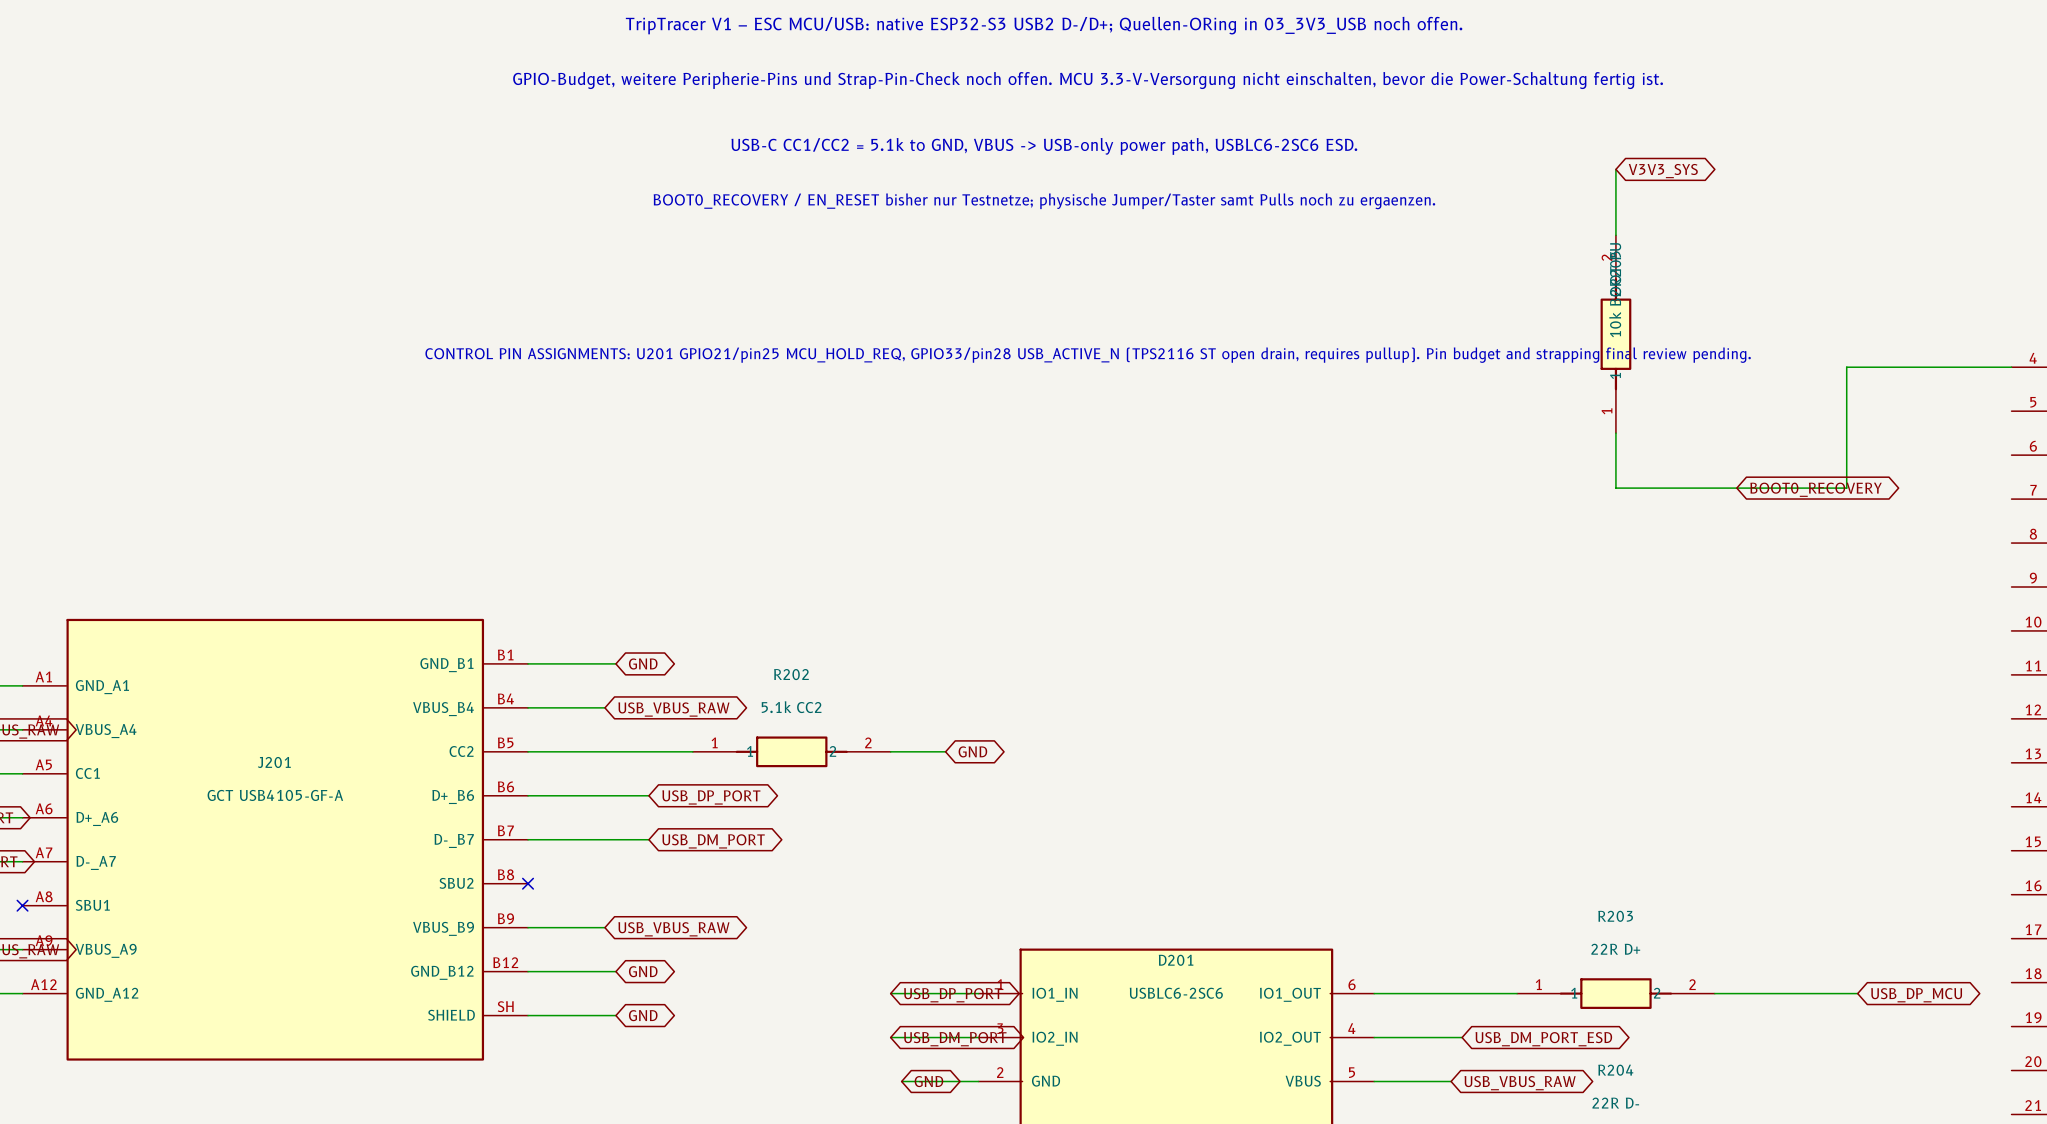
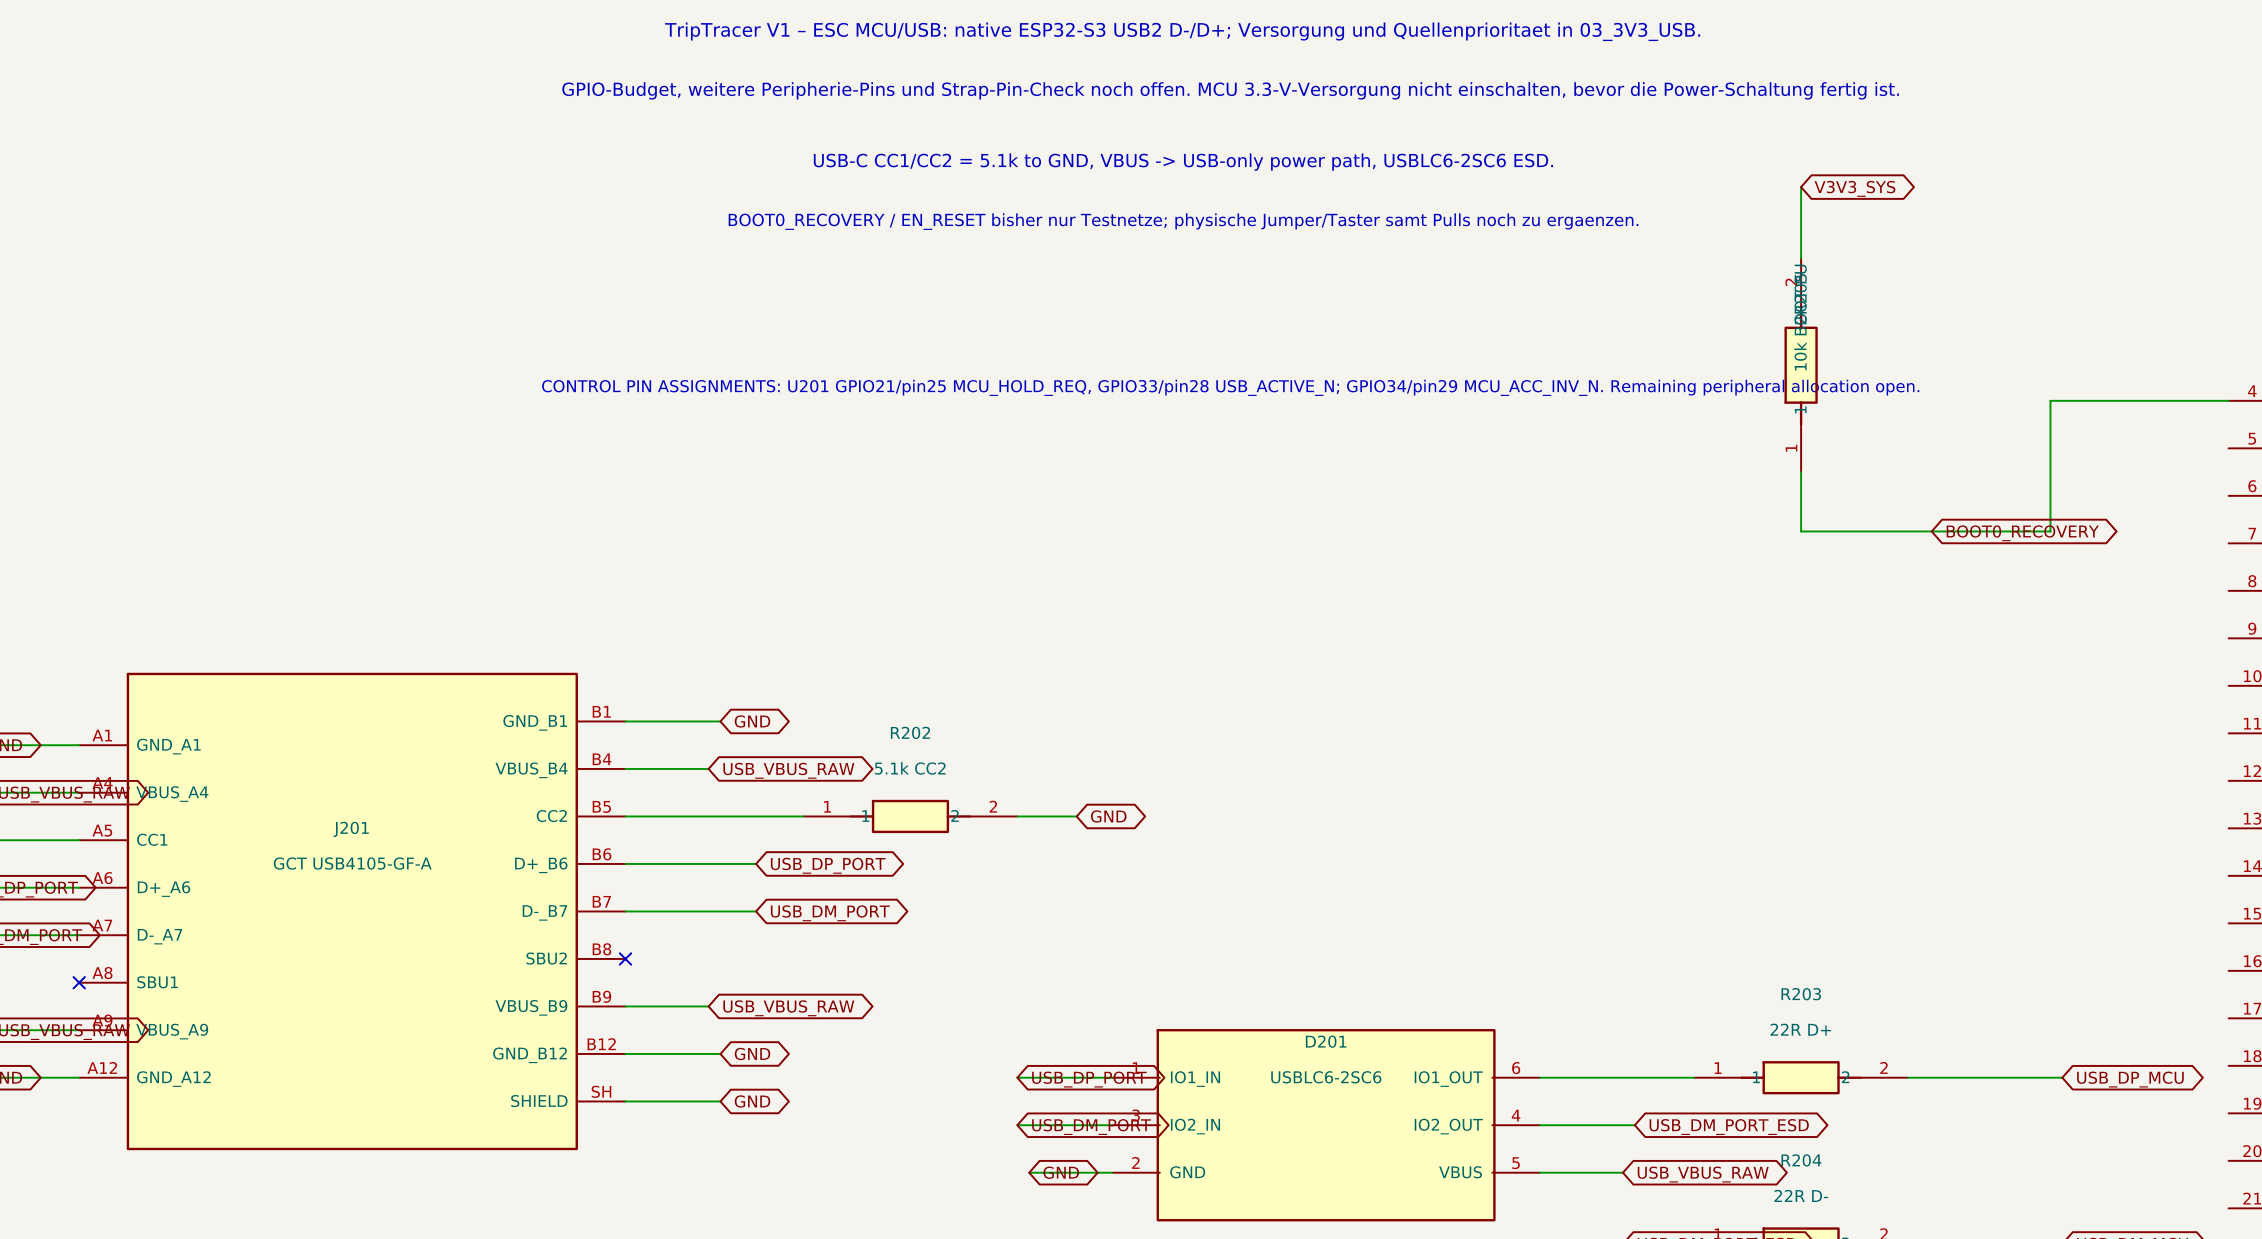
text: TripTracer V1 – ESC MCU/USB: native ESP32-S3 USB2 D-/D+; Quellen-ORing in 03_3V3_USB noch offen. (1044, 25) -> TripTracer V1 – ESC MCU/USB: native ESP32-S3 USB2 D-/D+; Versorgung und Quellenprioritaet in 03_3V3_USB. (1182, 31)
text: CONTROL PIN ASSIGNMENTS: U201 GPIO21/pin25 MCU_HOLD_REQ, GPIO33/pin28 USB_ACTIVE_N (TPS2116 ST open drain, requires pullup). Pin budget and strapping final review pending. (1088, 355) -> CONTROL PIN ASSIGNMENTS: U201 GPIO21/pin25 MCU_HOLD_REQ, GPIO33/pin28 USB_ACTIVE_N; GPIO34/pin29 MCU_ACC_INV_N. Remaining peripheral allocation open. (1230, 387)

